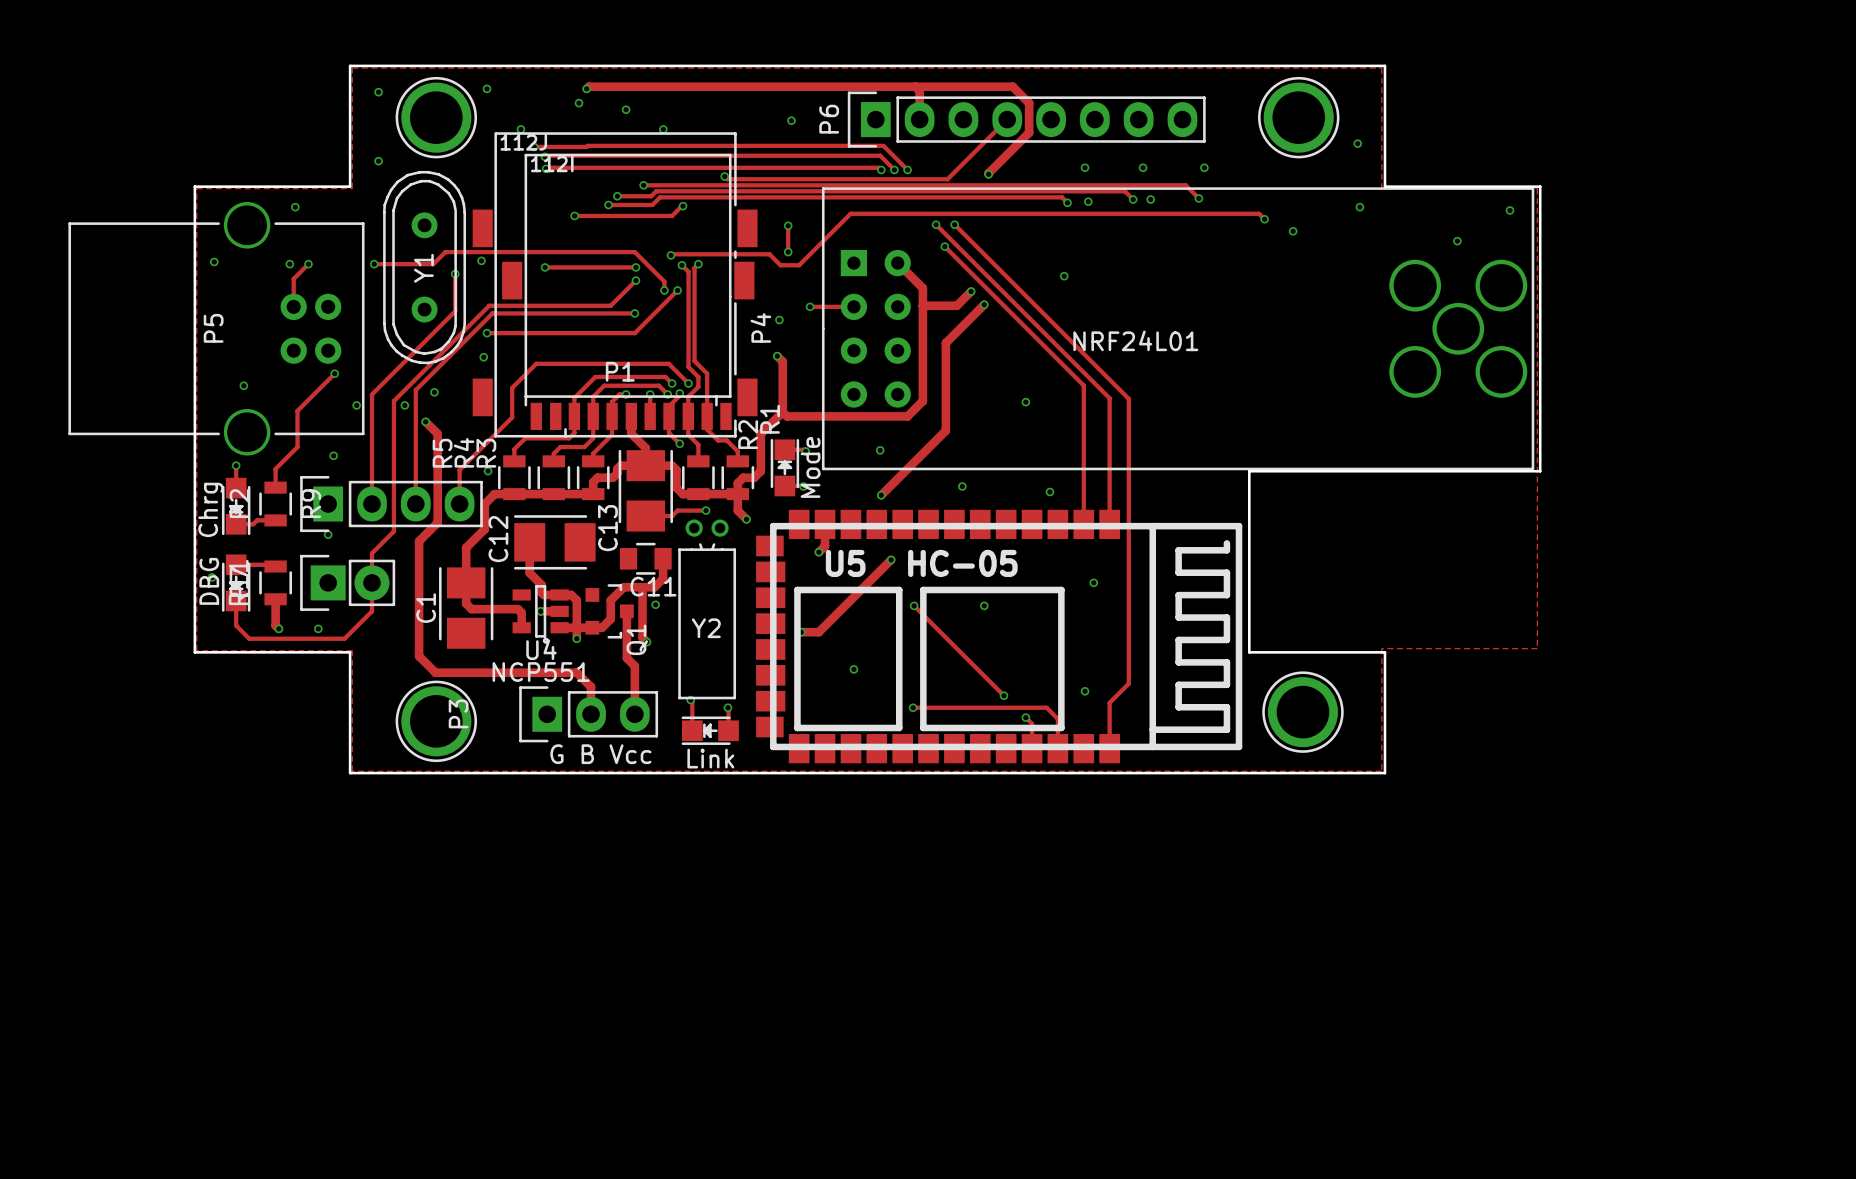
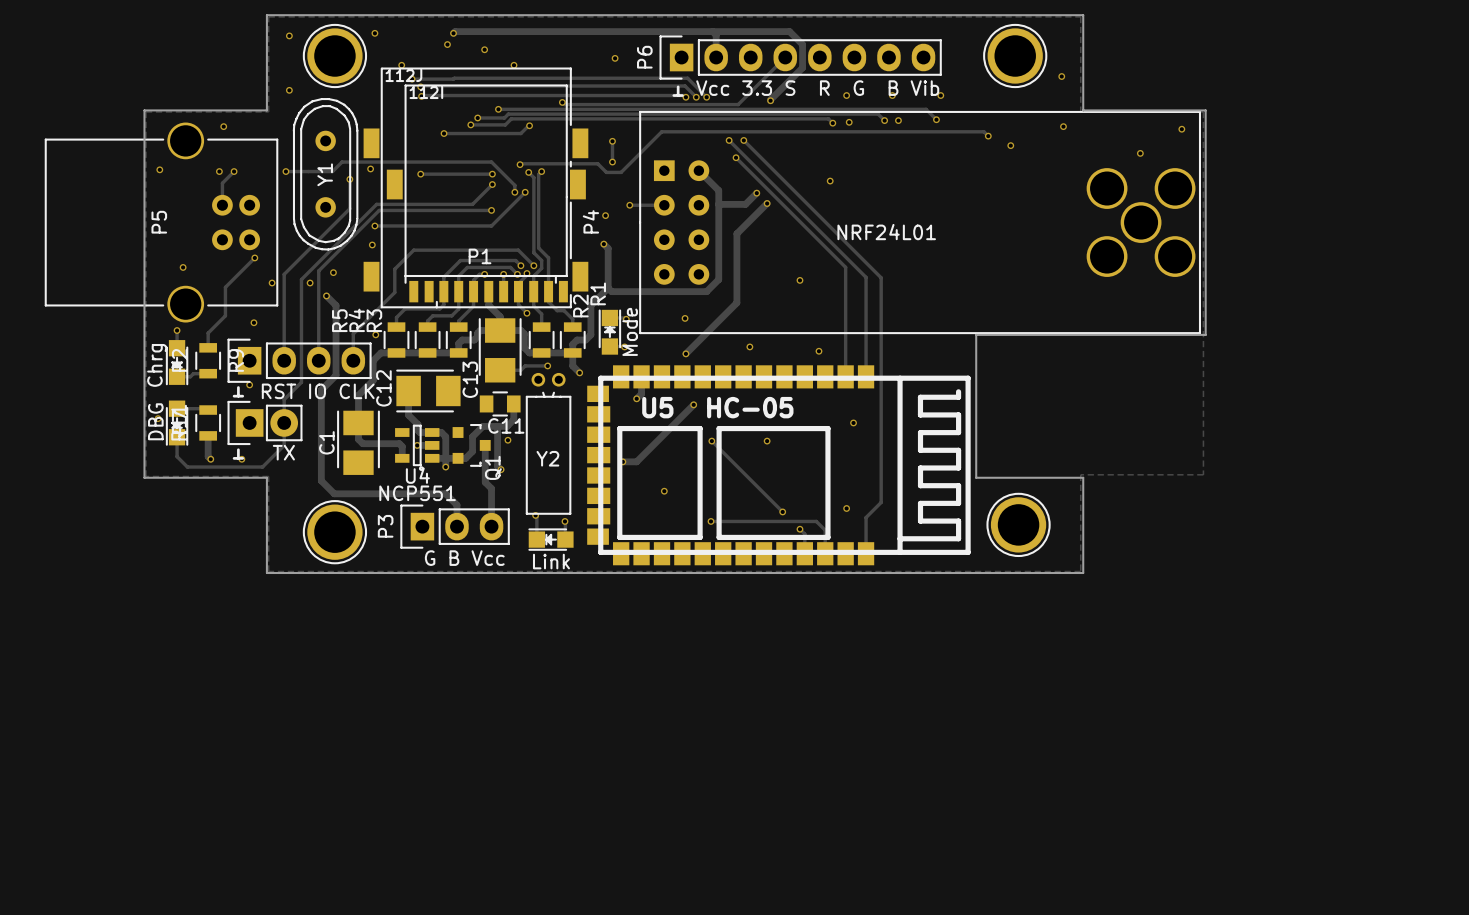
line: none -> (678, 86) (678, 95)
text: none -> Vcc 3.3 S R G B Vib (817, 88)
line: none -> (673, 95) (682, 95)
line: none -> (238, 387) (238, 396)
text: none -> RST IO CLK (318, 391)
line: none -> (234, 396) (242, 396)
line: none -> (238, 449) (238, 458)
text: none -> TX (283, 452)
line: none -> (234, 458) (242, 458)
P3 name position: P3 (458, 713) -> P3 (385, 526)

